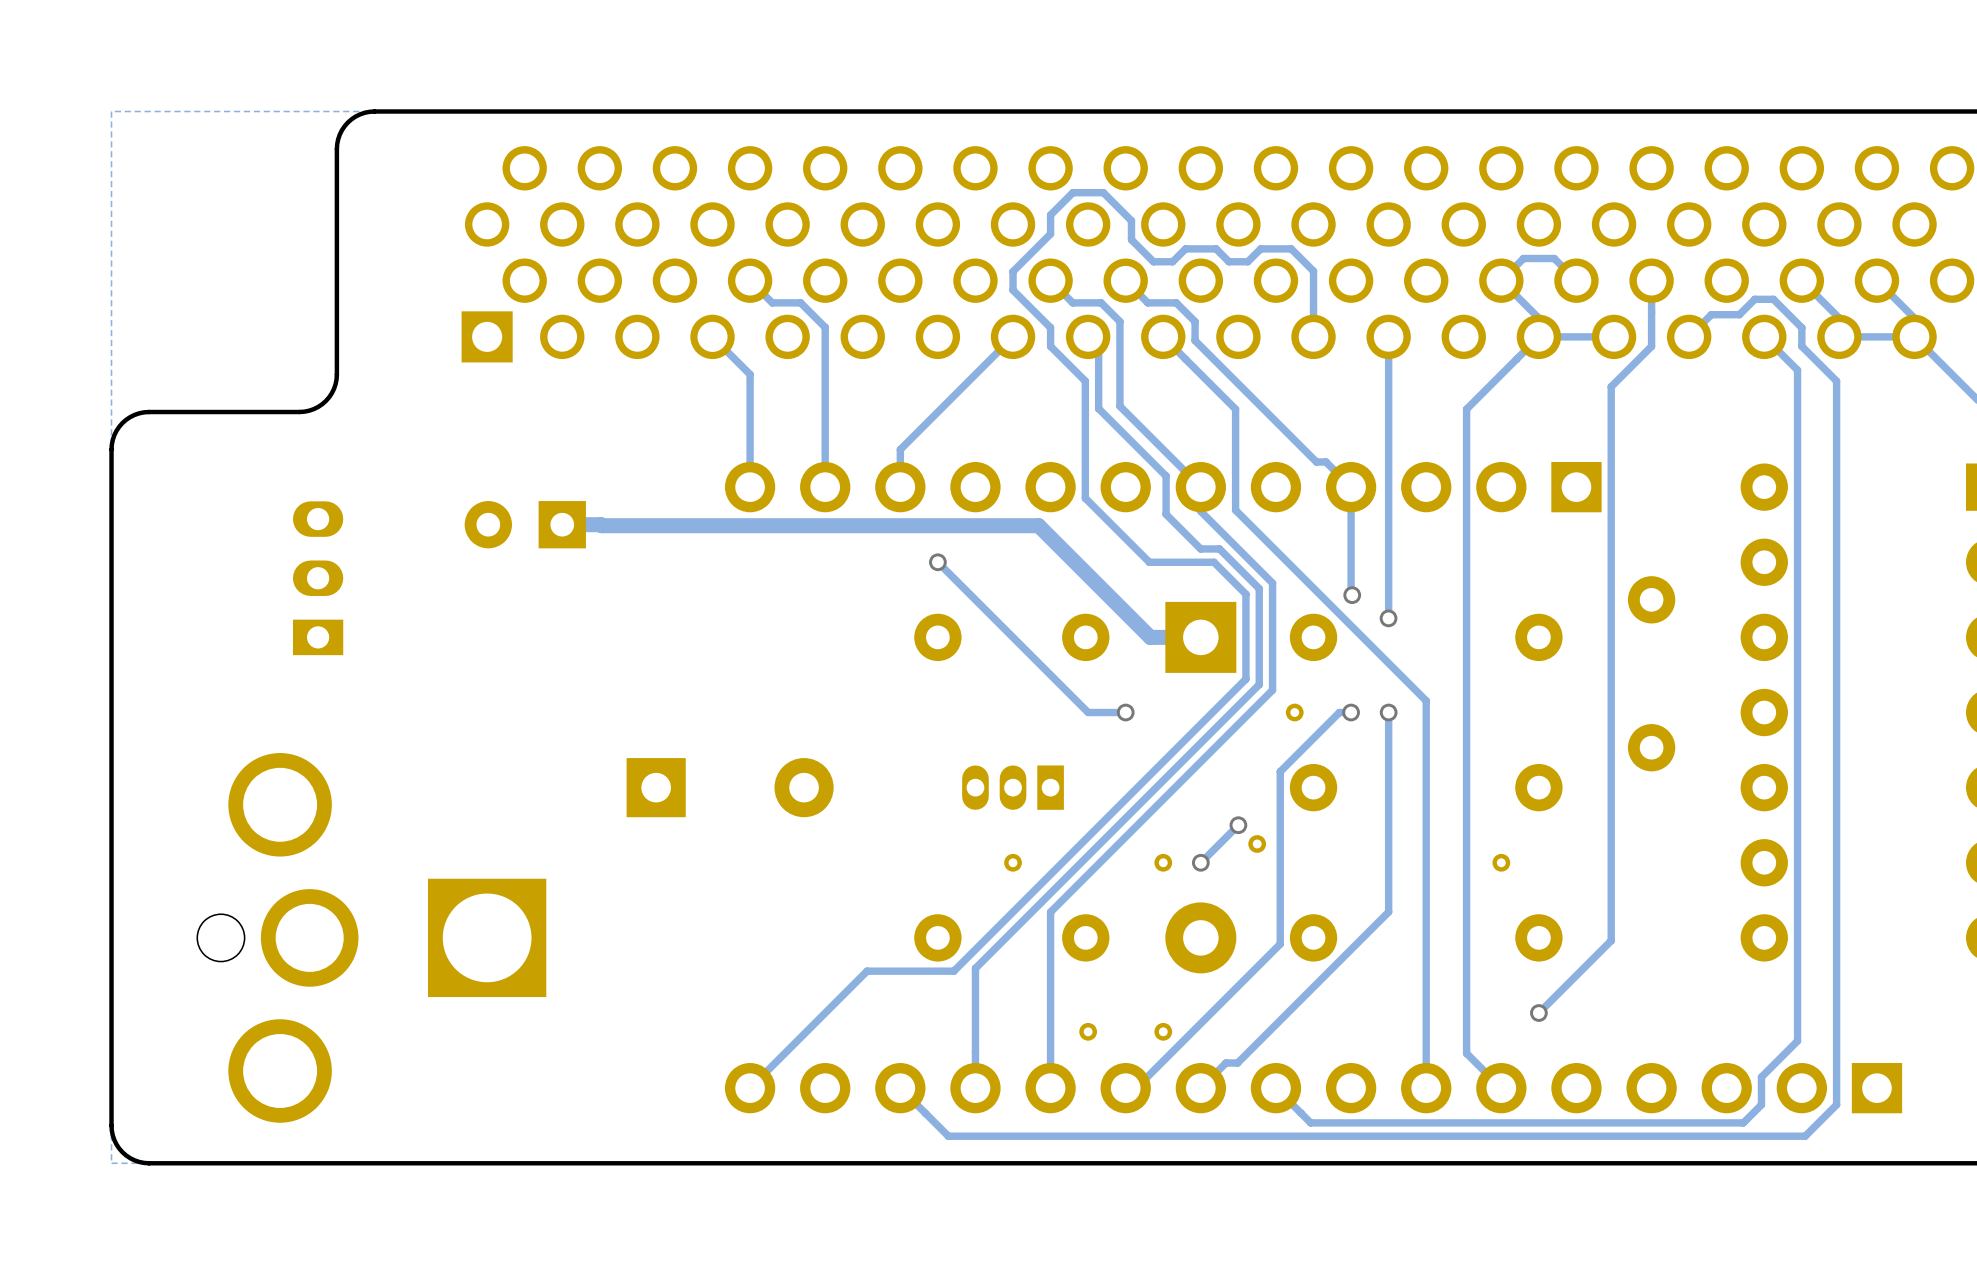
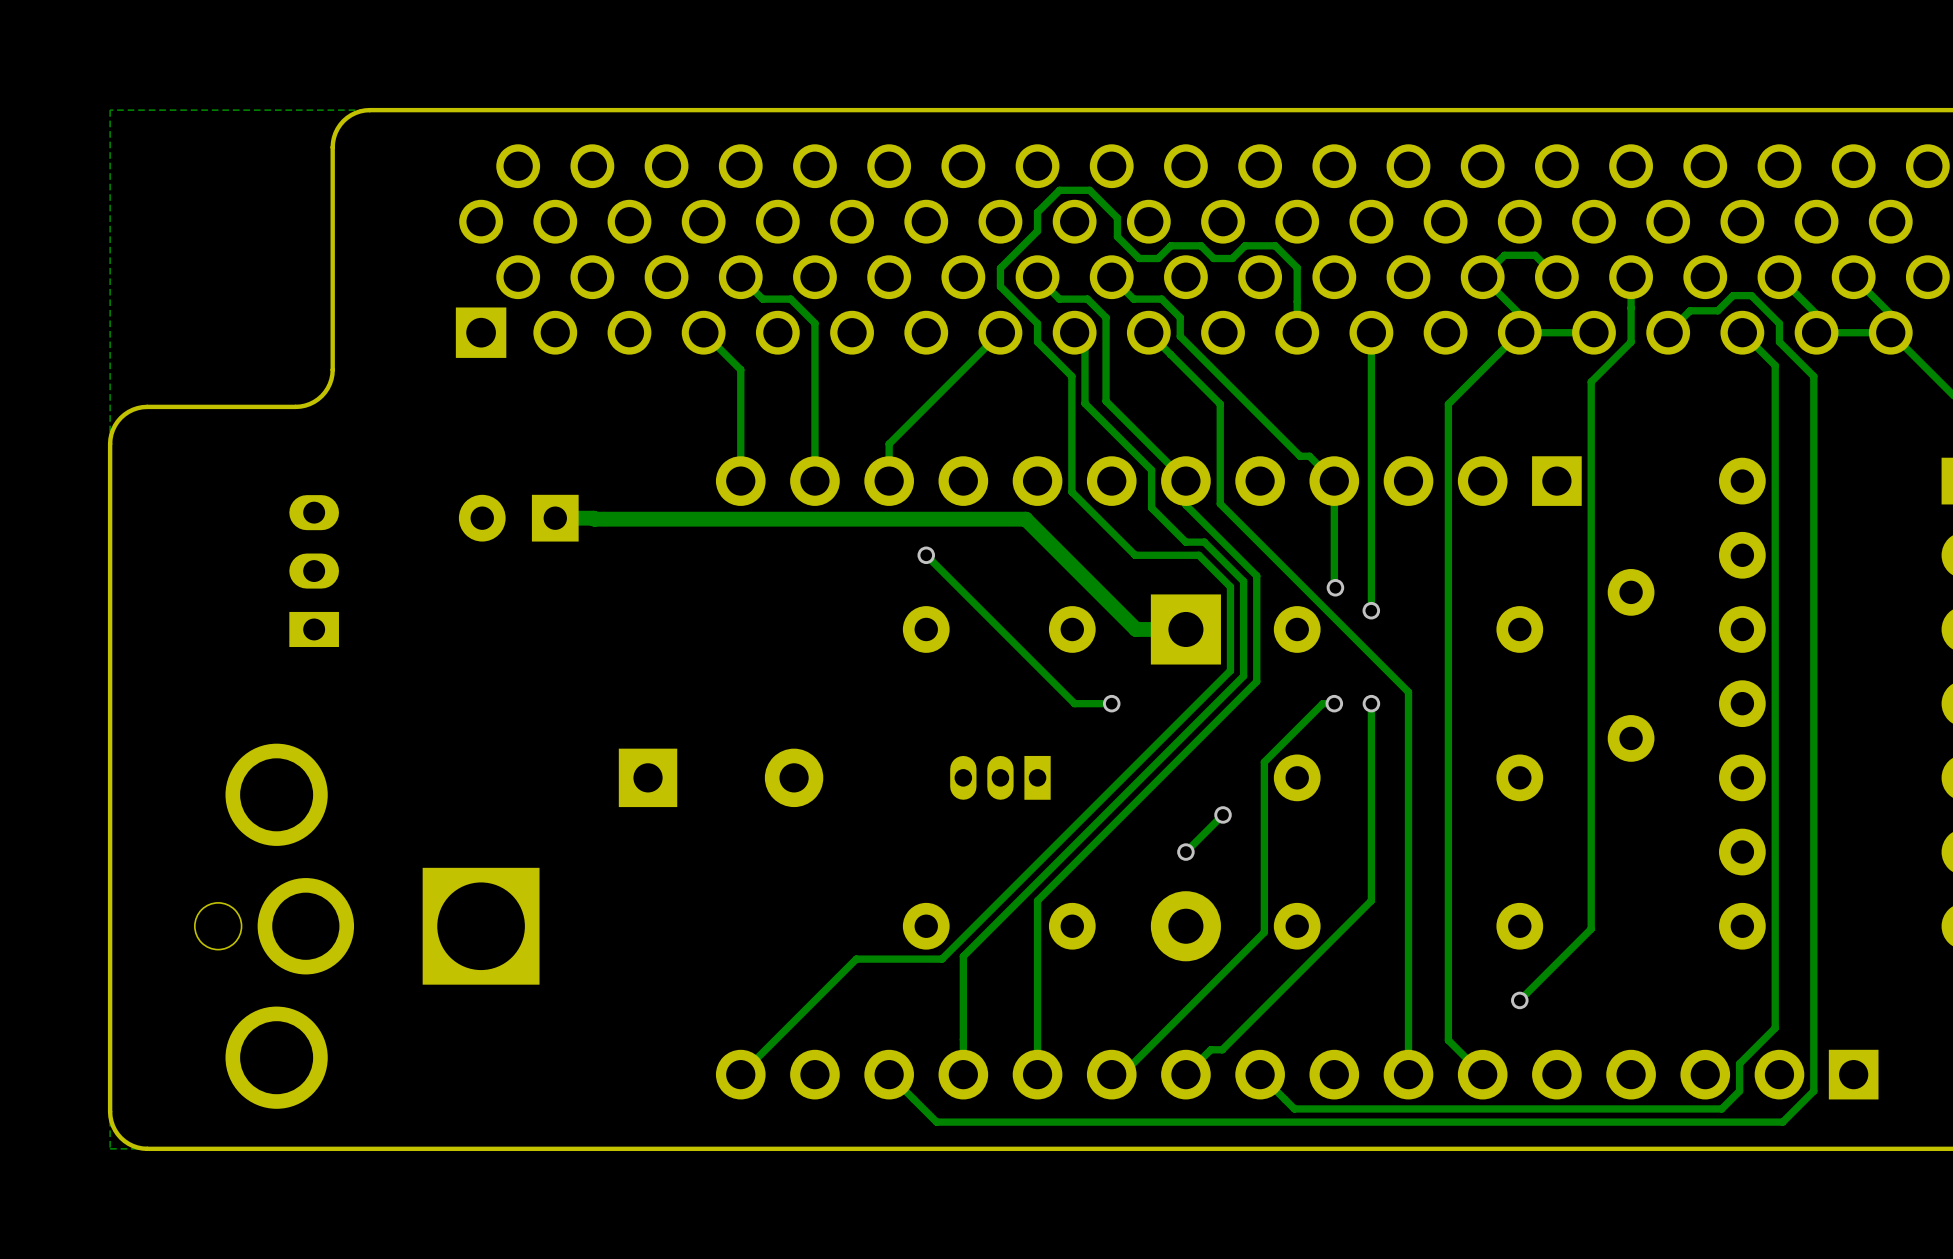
part: (1294, 712) -> none
part: (1257, 843) -> none
part: (1013, 862) -> none
part: (1163, 862) -> none
part: (1501, 862) -> none
part: (1088, 1031) -> none
part: (1163, 1031) -> none

